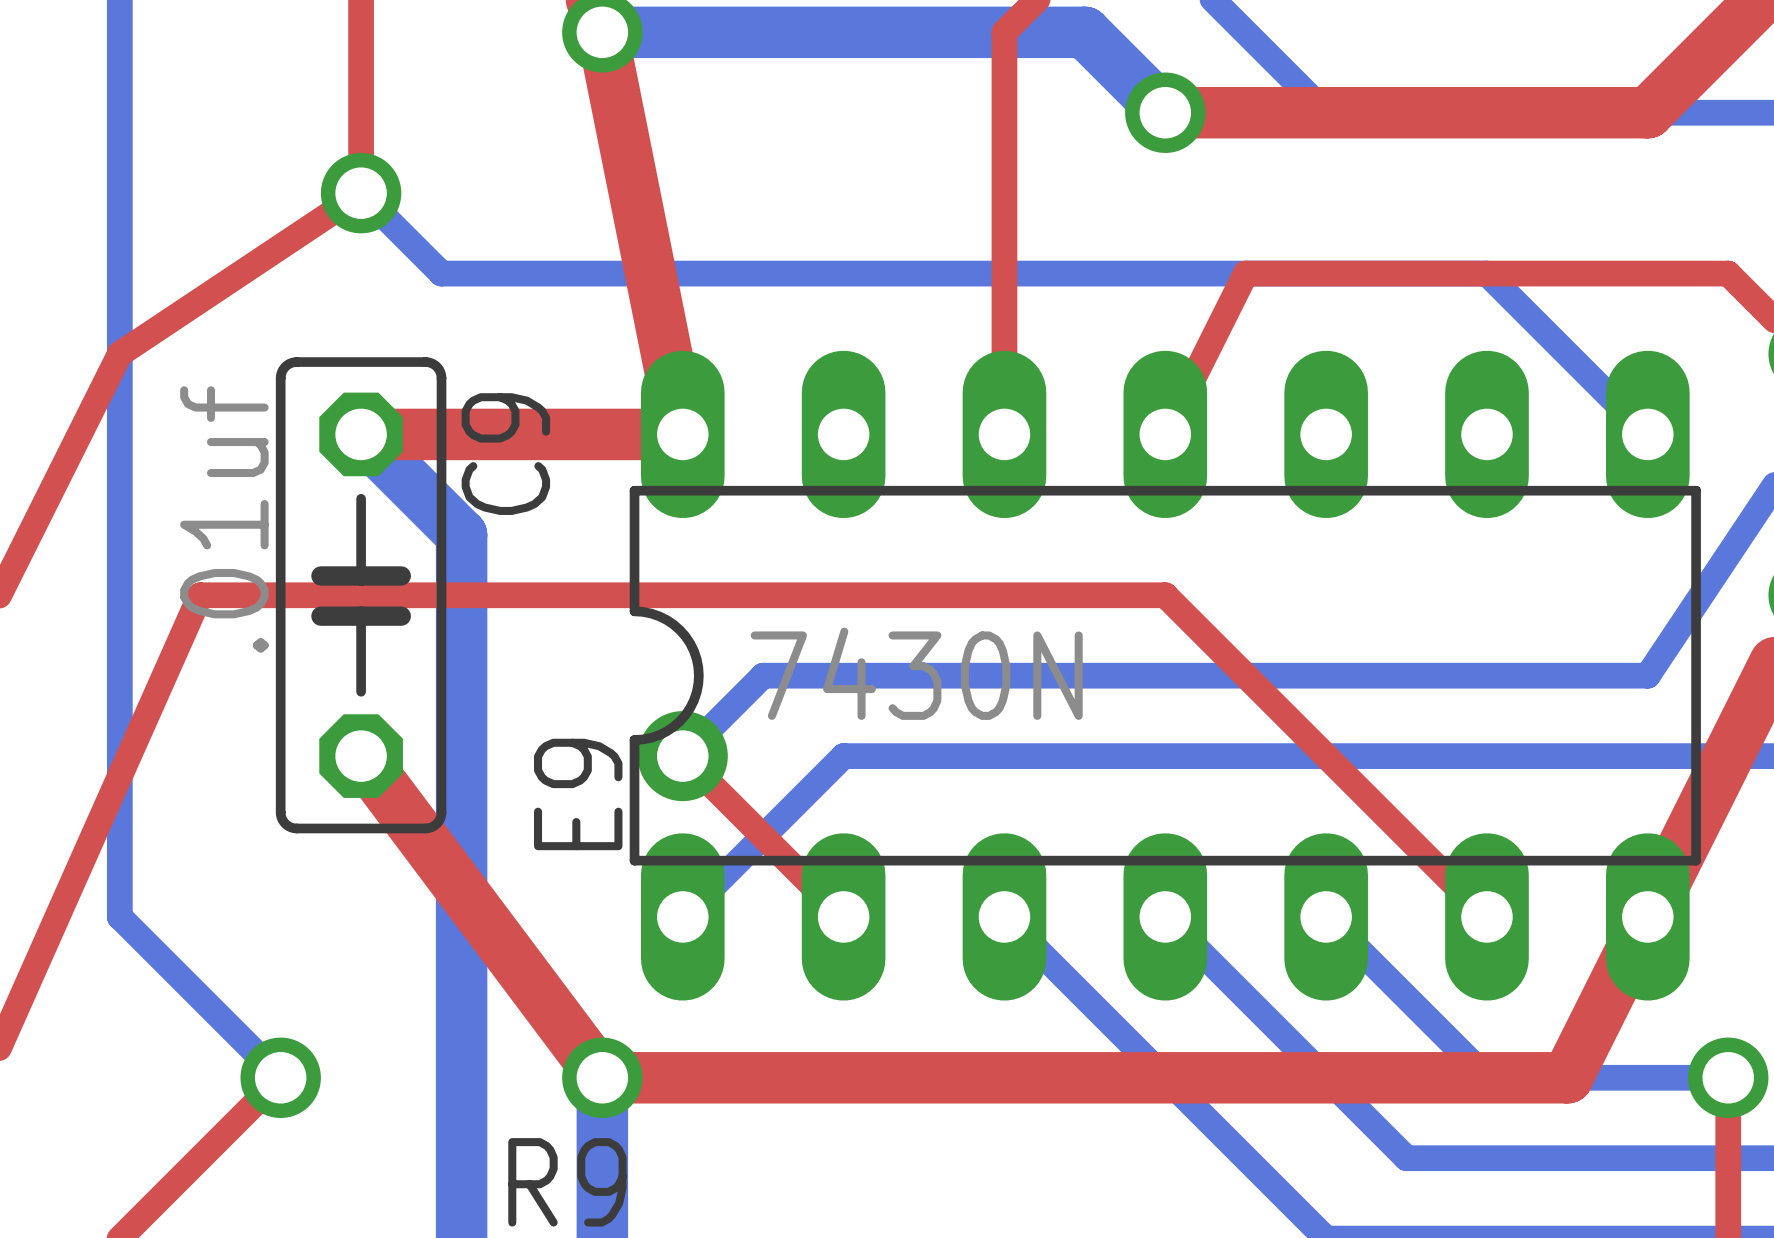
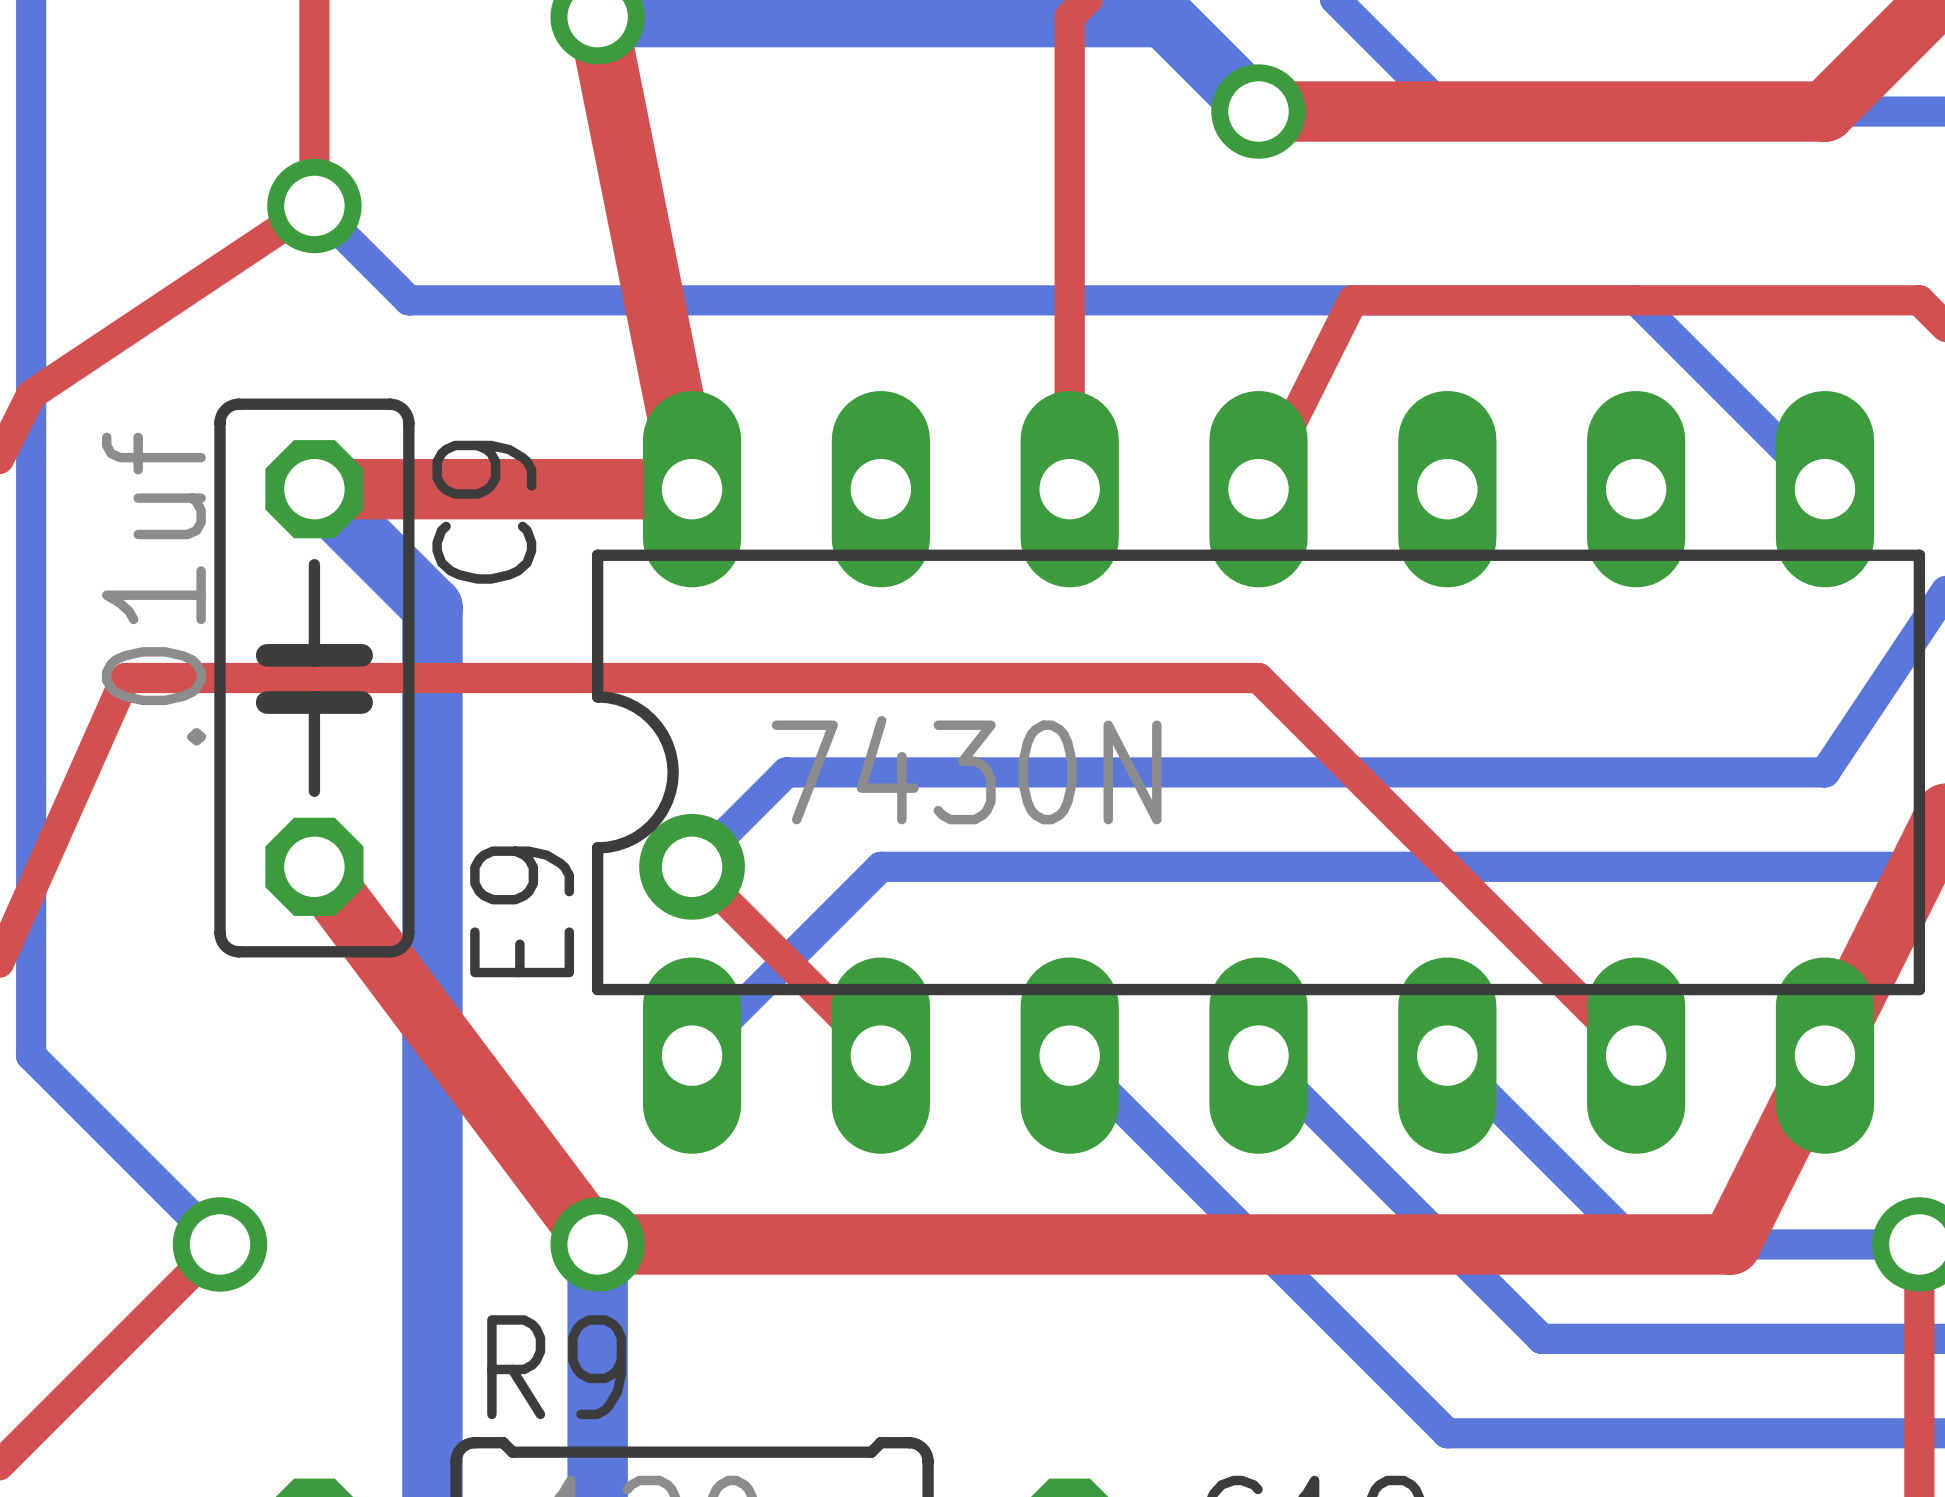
E9 footprint: [629, 350, 1701, 1001] -> [591, 390, 1926, 1154]
E9 name position: E9 (578, 794) -> E9 (522, 911)

